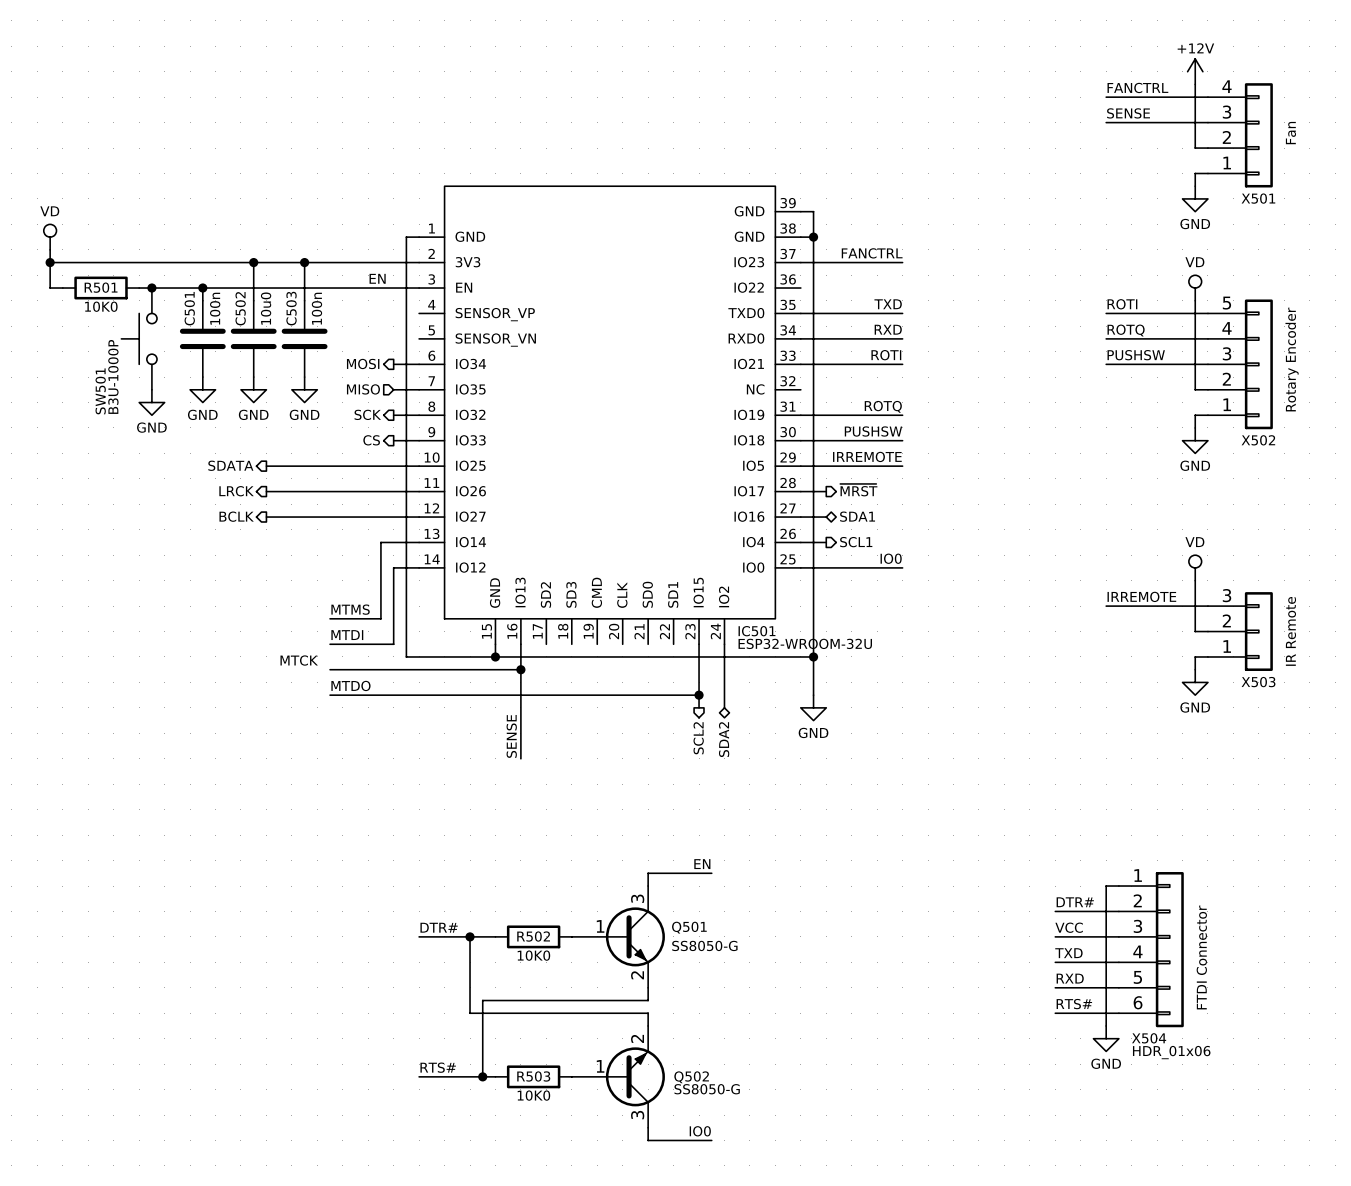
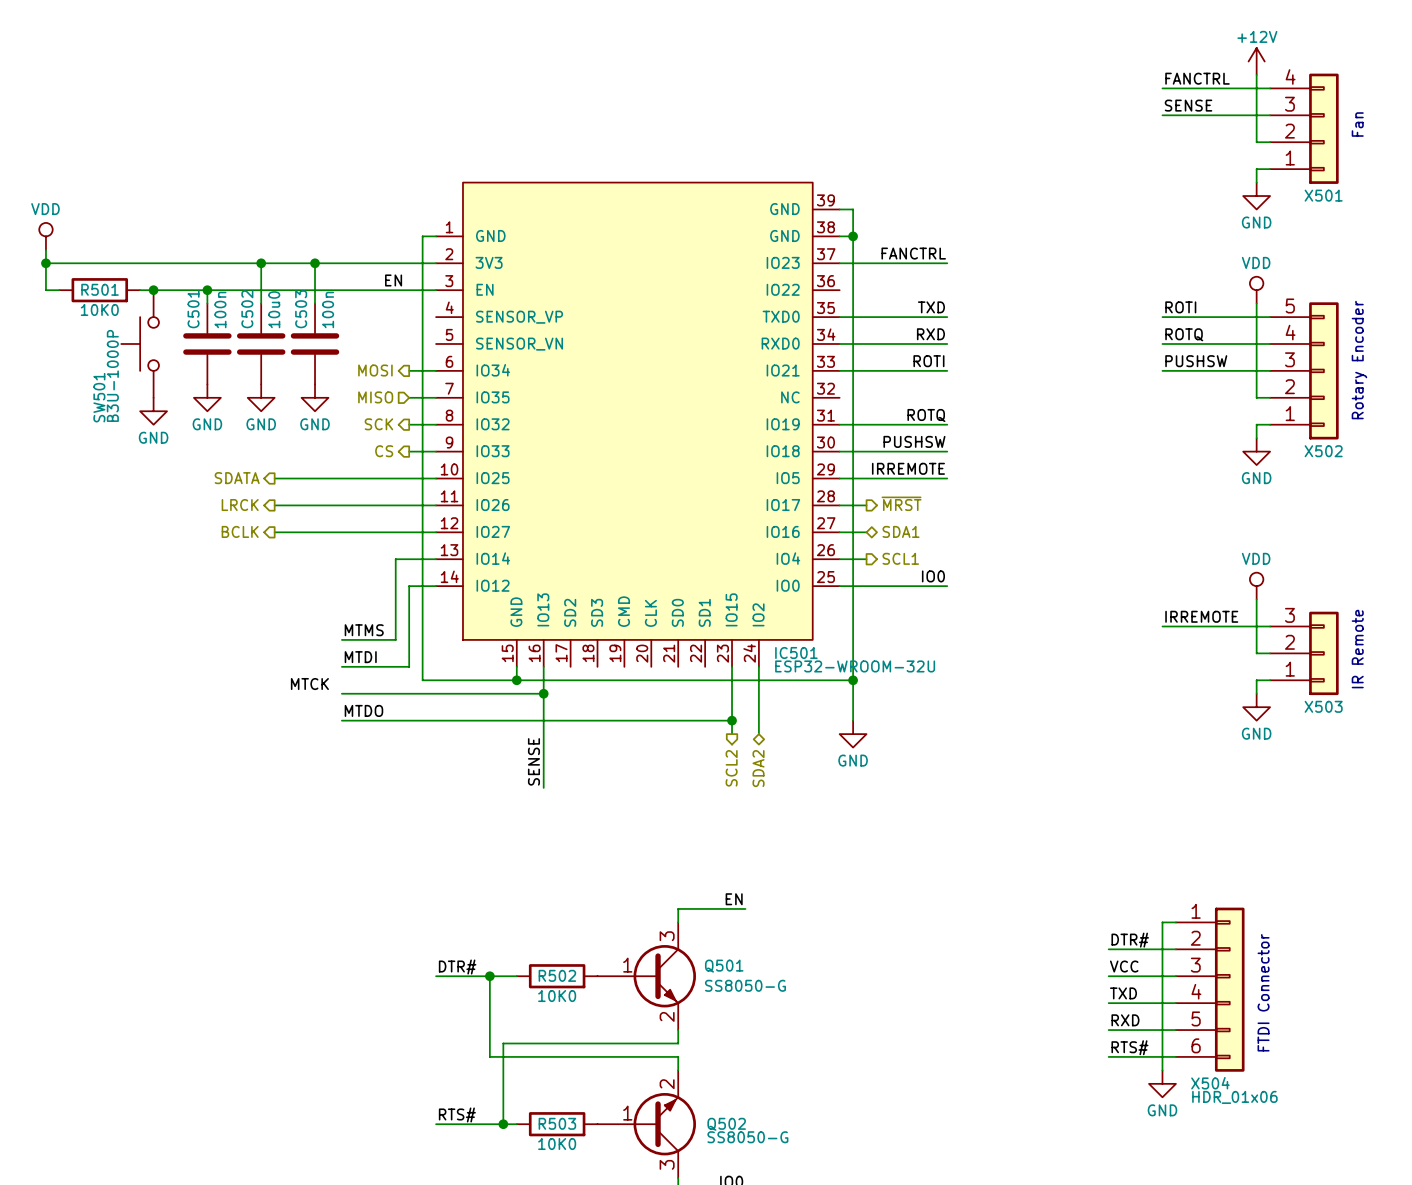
power symbol: VD (50, 237) -> VDD (45, 236)
power symbol: VD (1195, 288) -> VDD (1256, 290)
power symbol: VD (1195, 567) -> VDD (1256, 586)

